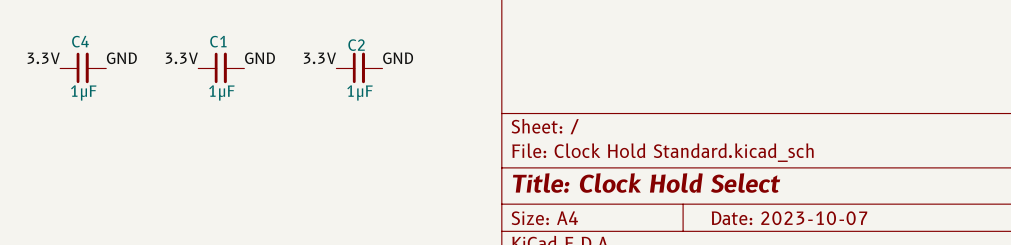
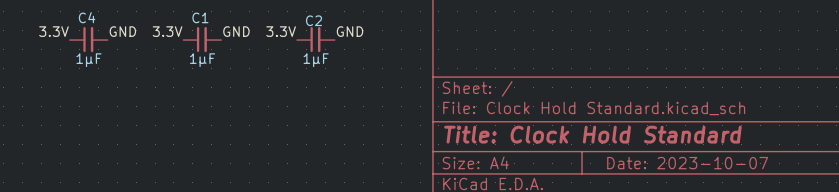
title block: Title: Clock Hold Select (646, 183) -> Title: Clock Hold Standard (592, 134)

